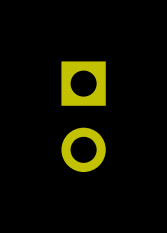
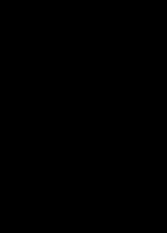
part: (83, 116) -> none

